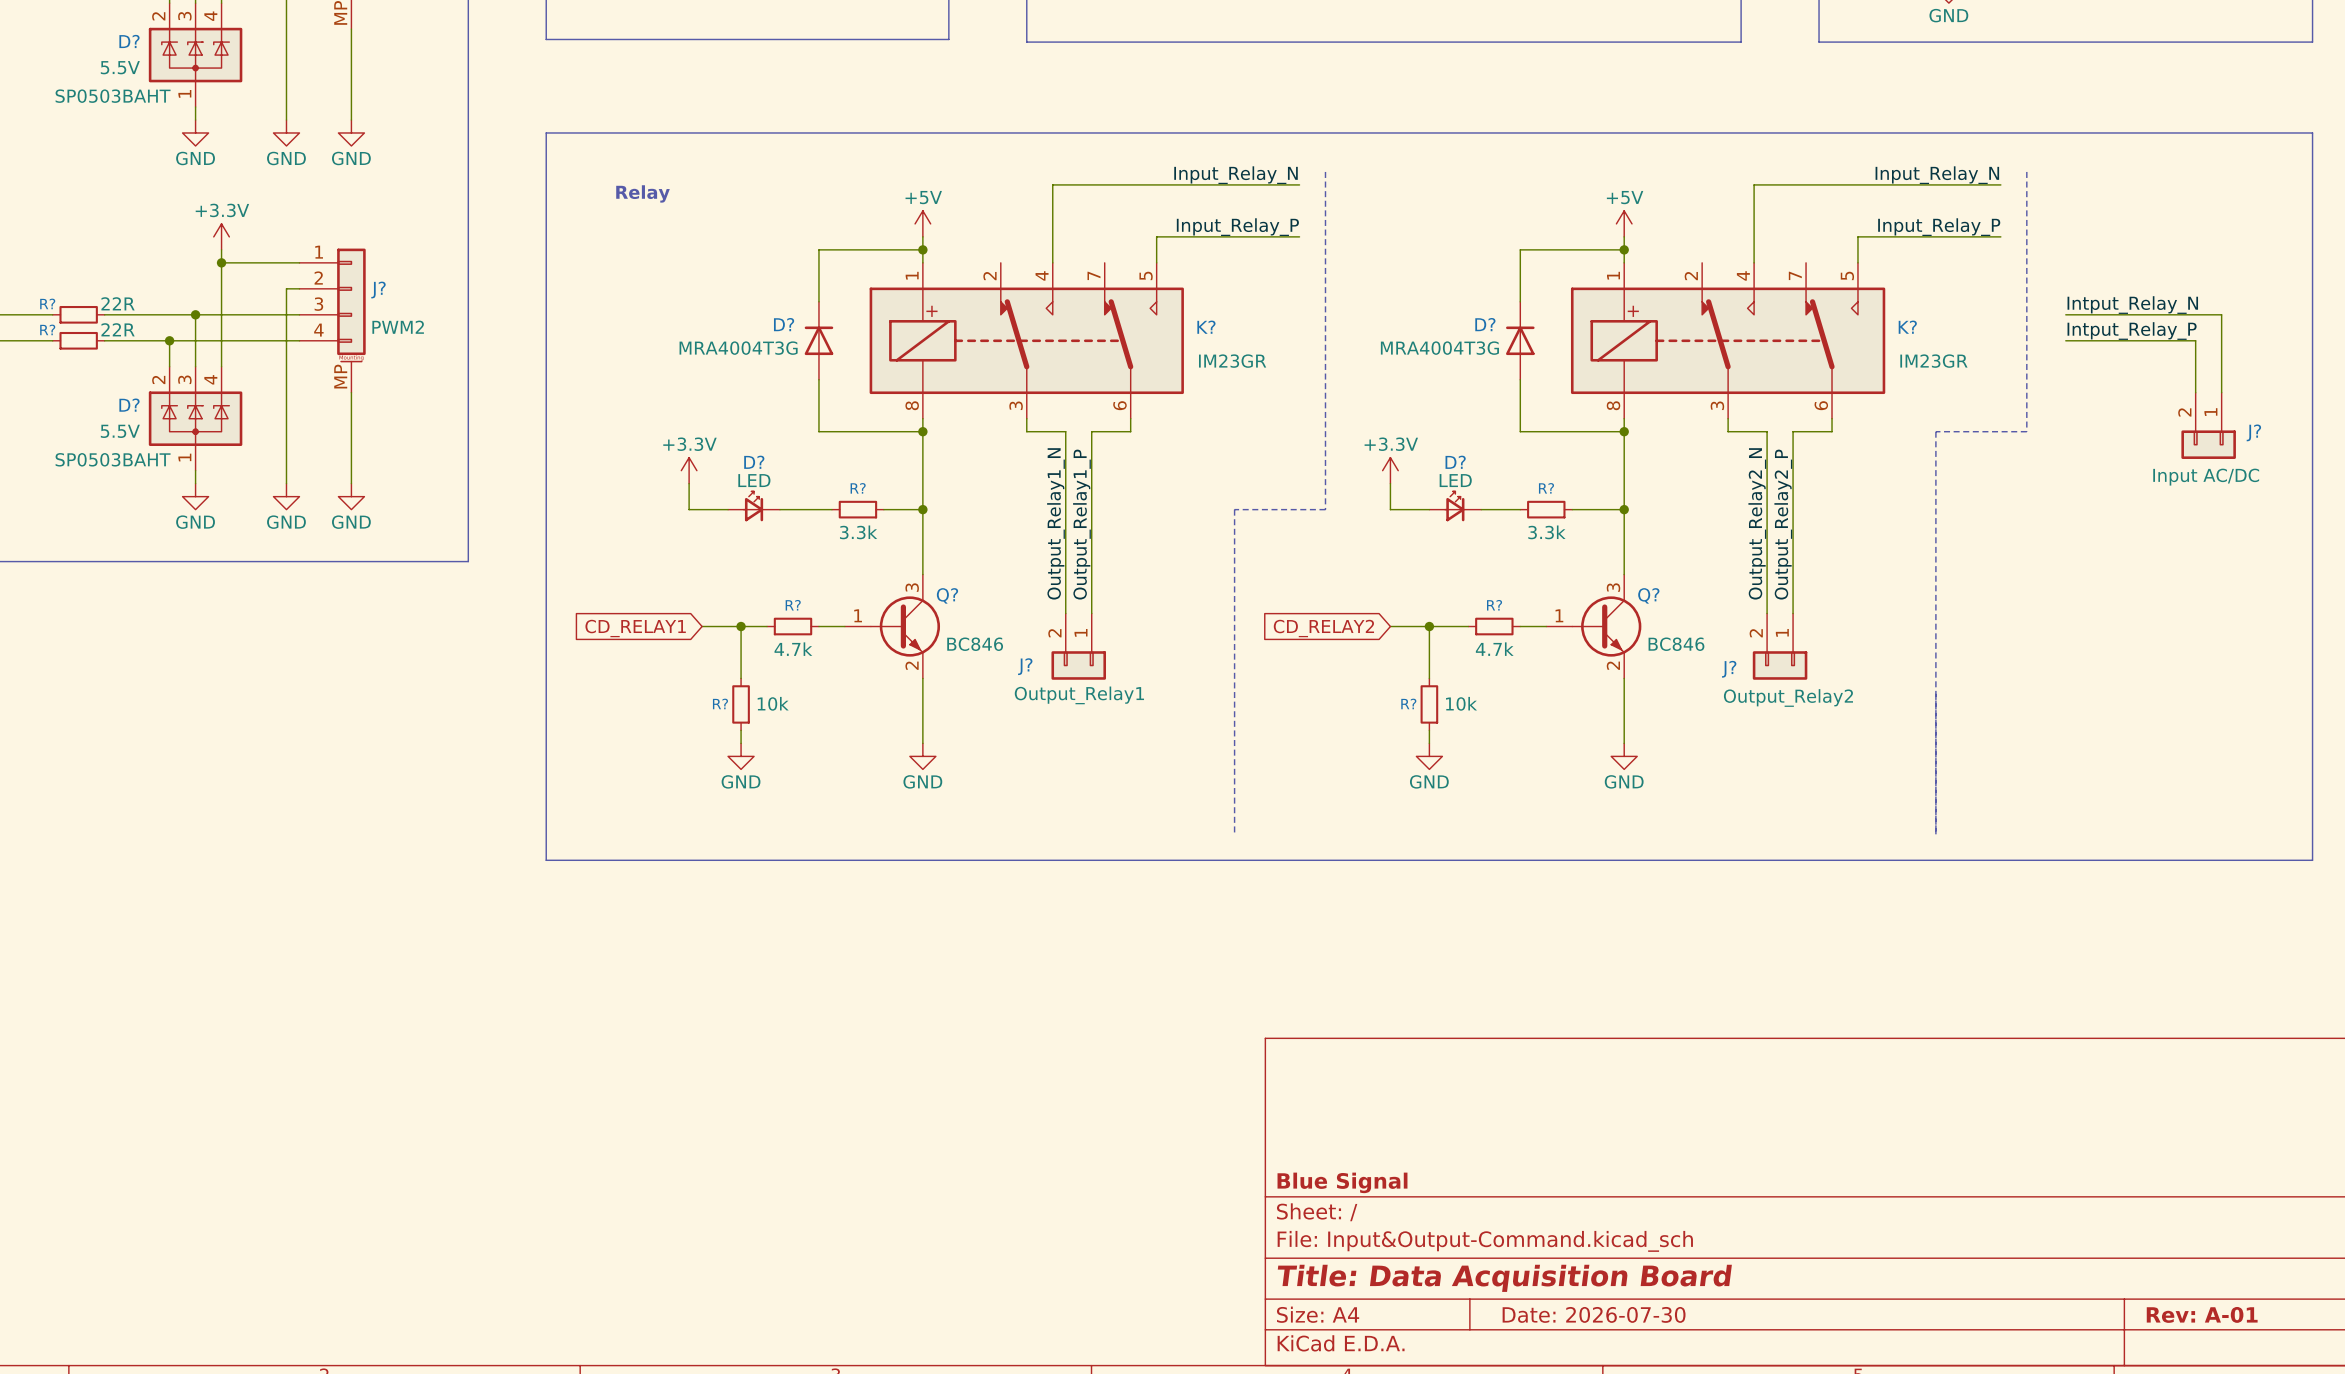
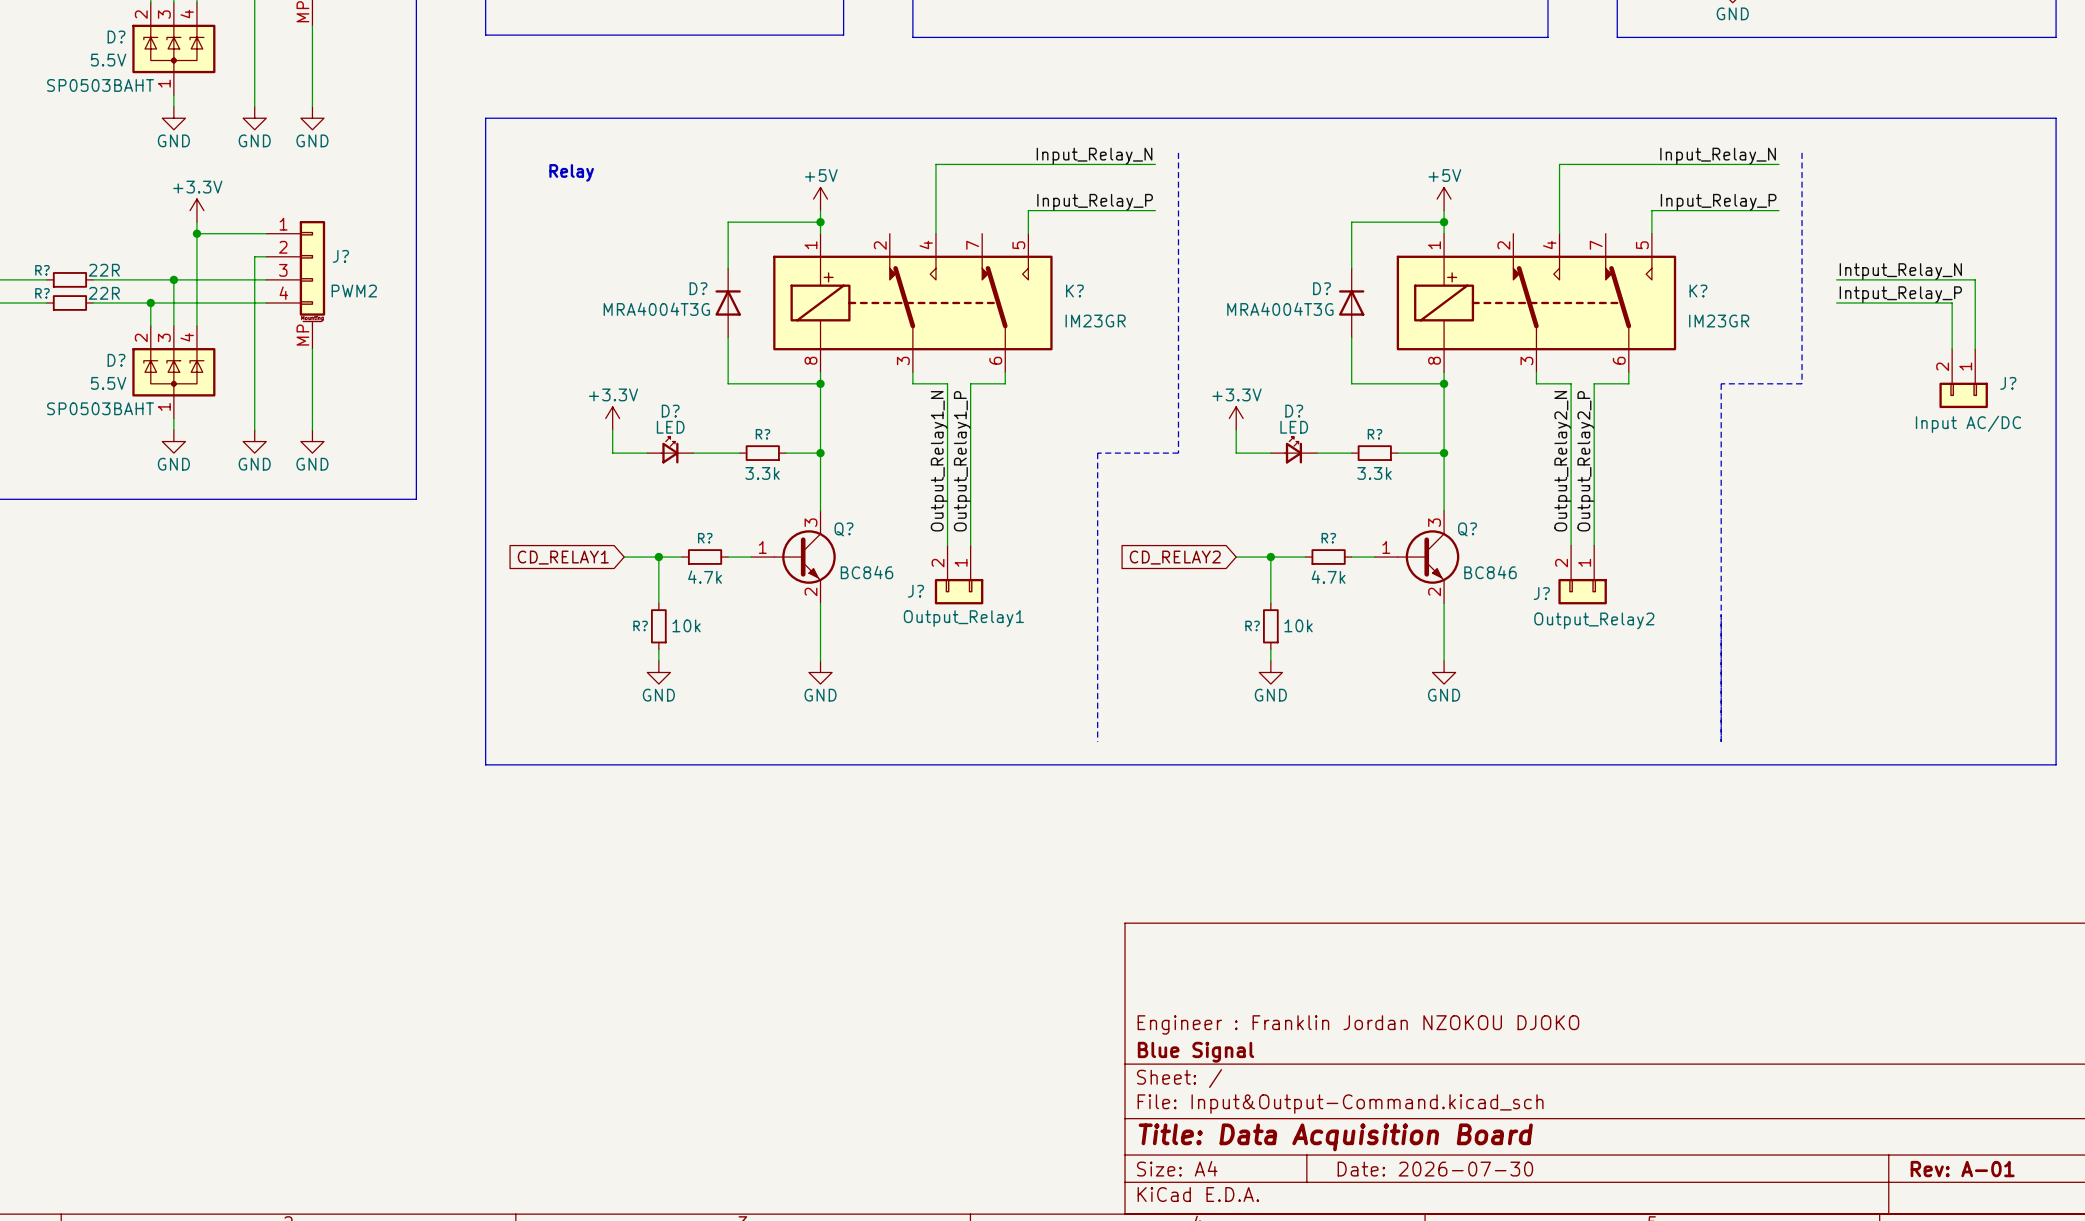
title block: none -> Engineer : Franklin Jordan NZOKOU DJOKO (1358, 1024)

